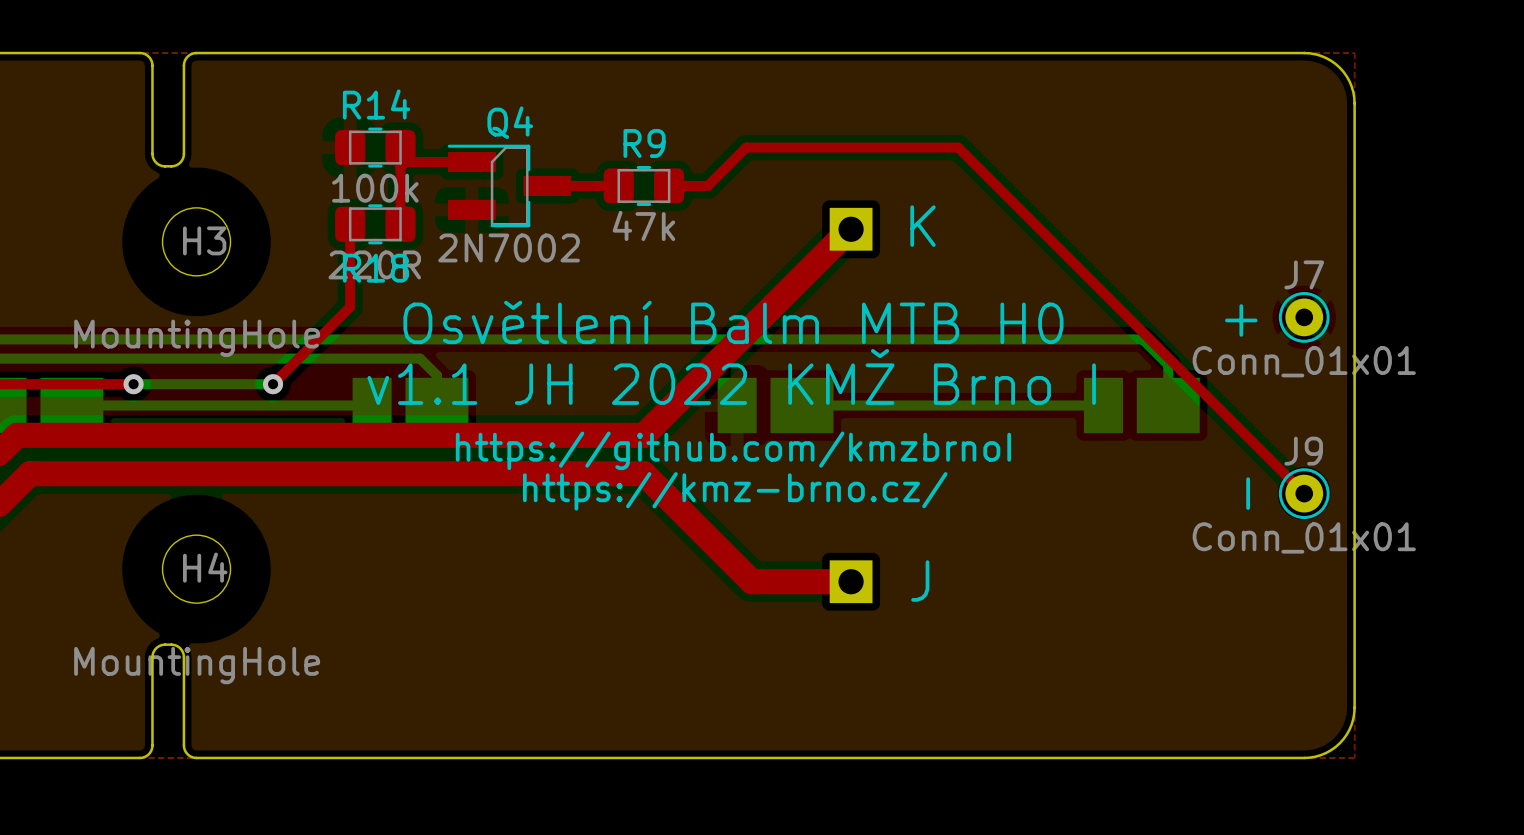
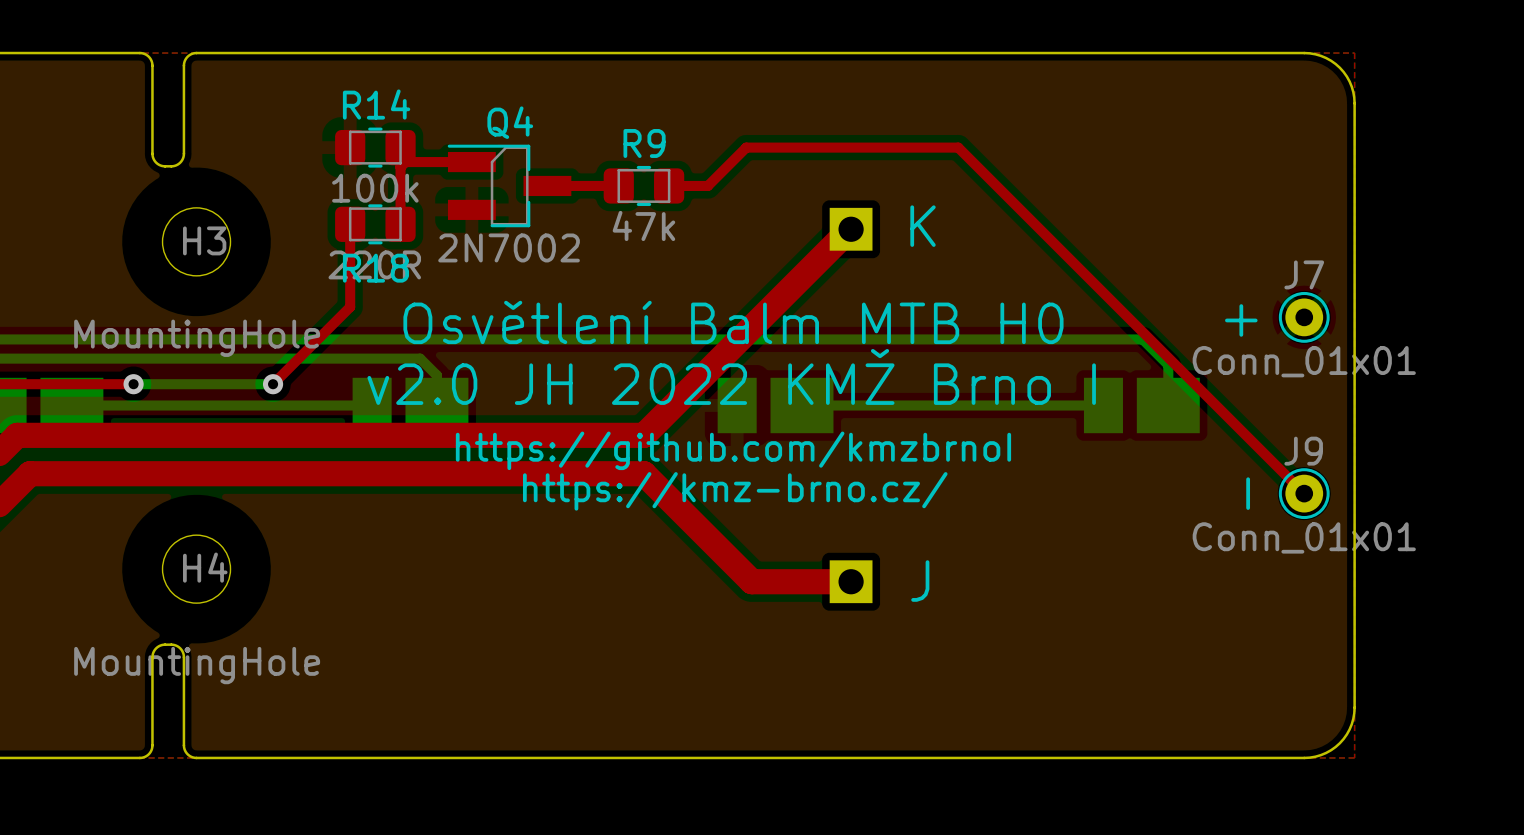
text: v1.1 JH 2022 KMŽ Brno I (731, 376) -> v2.0 JH 2022 KMŽ Brno I (731, 376)

